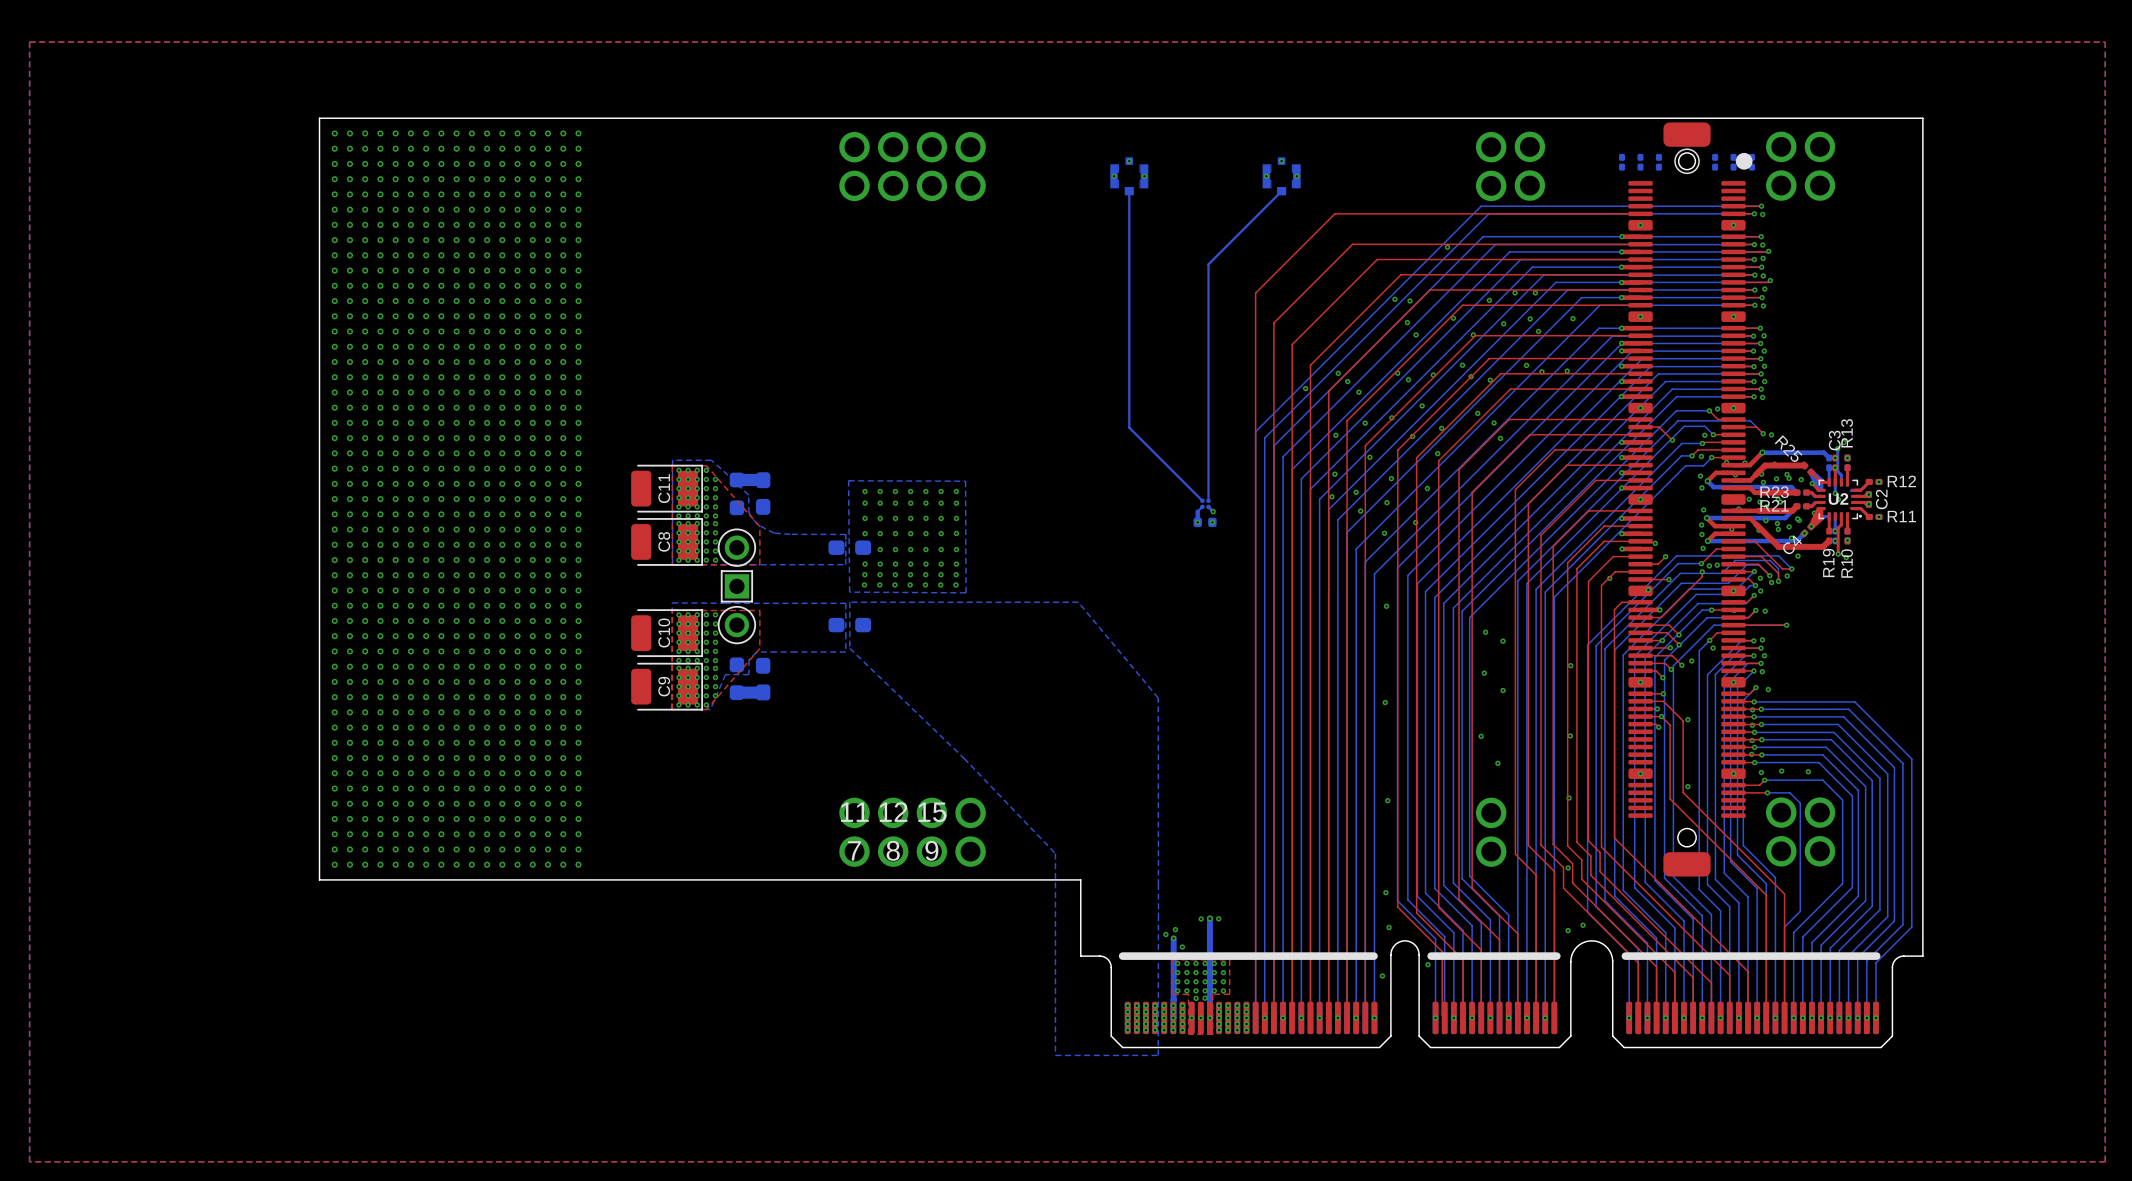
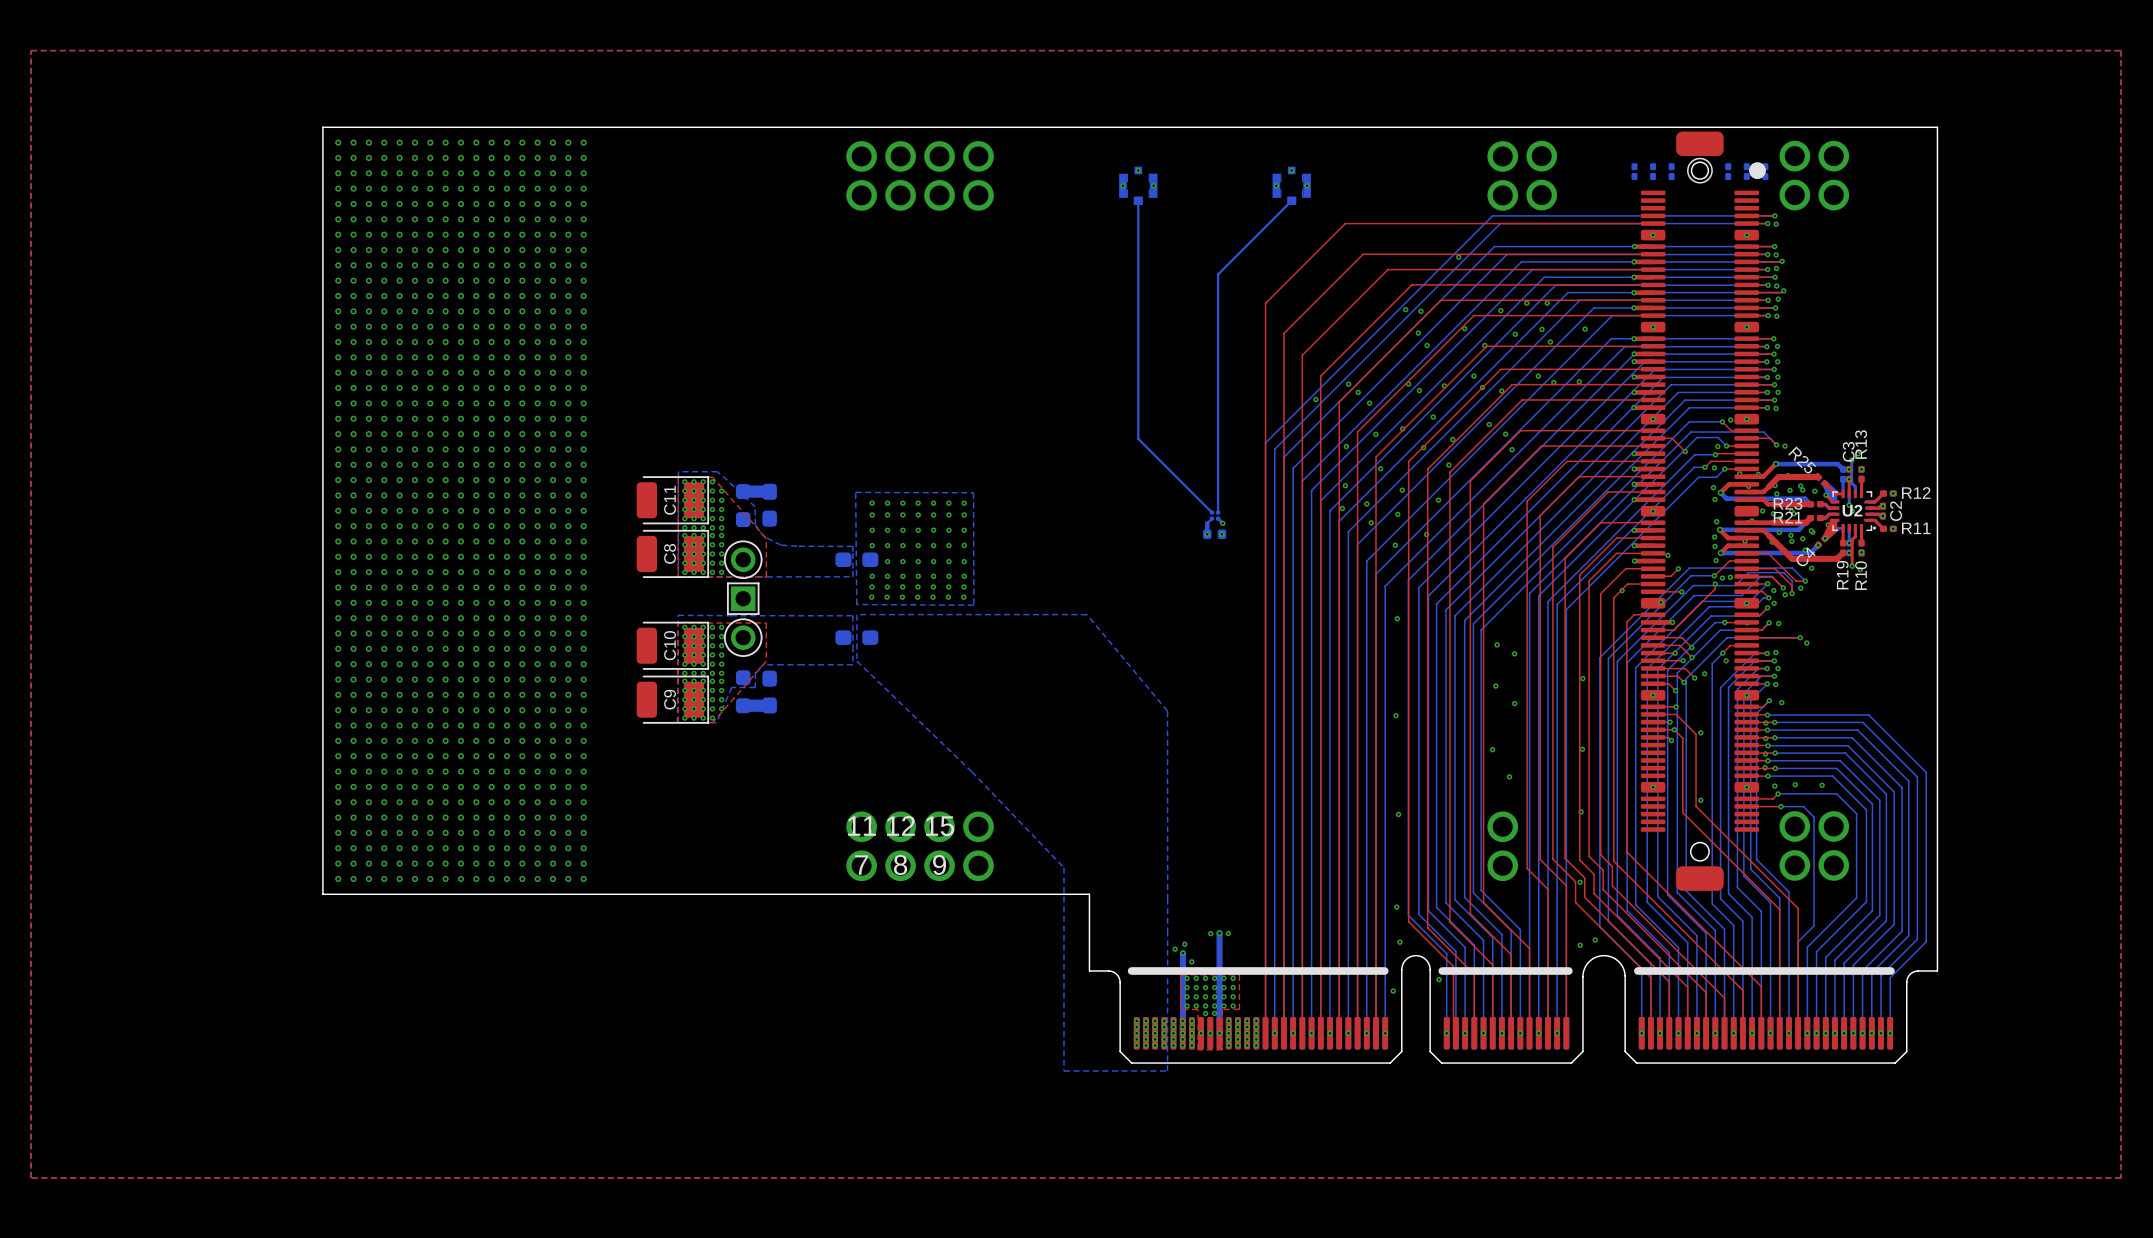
via: none -> (1806, 643)

